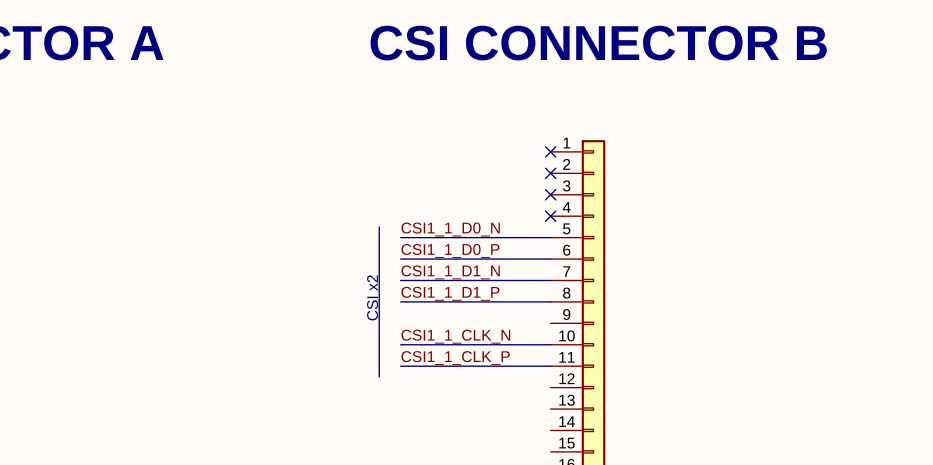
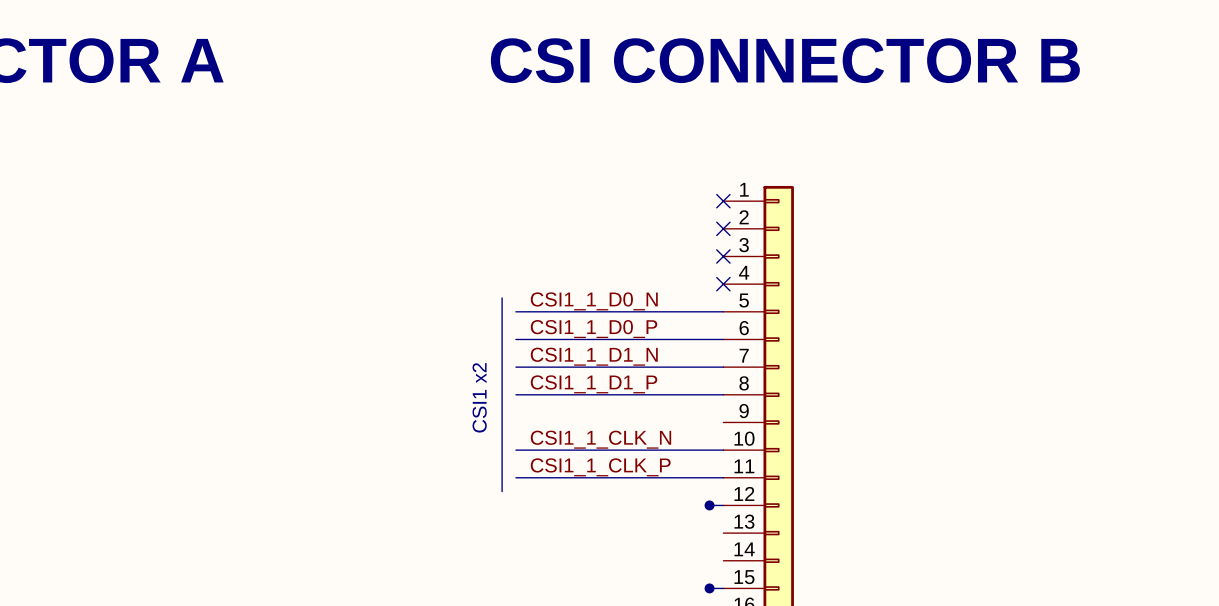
wire: none -> (515, 311) (529, 311)
wire: none -> (515, 339) (529, 339)
wire: none -> (515, 367) (529, 367)
text: CSI x2 (372, 297) -> CSI1 x2 (479, 397)
wire: none -> (515, 394) (529, 394)
wire: none -> (515, 450) (529, 450)
wire: none -> (515, 477) (529, 477)
wire: none -> (709, 505) (723, 505)
junction: none -> (709, 505)
wire: none -> (709, 588) (723, 588)
junction: none -> (709, 588)

